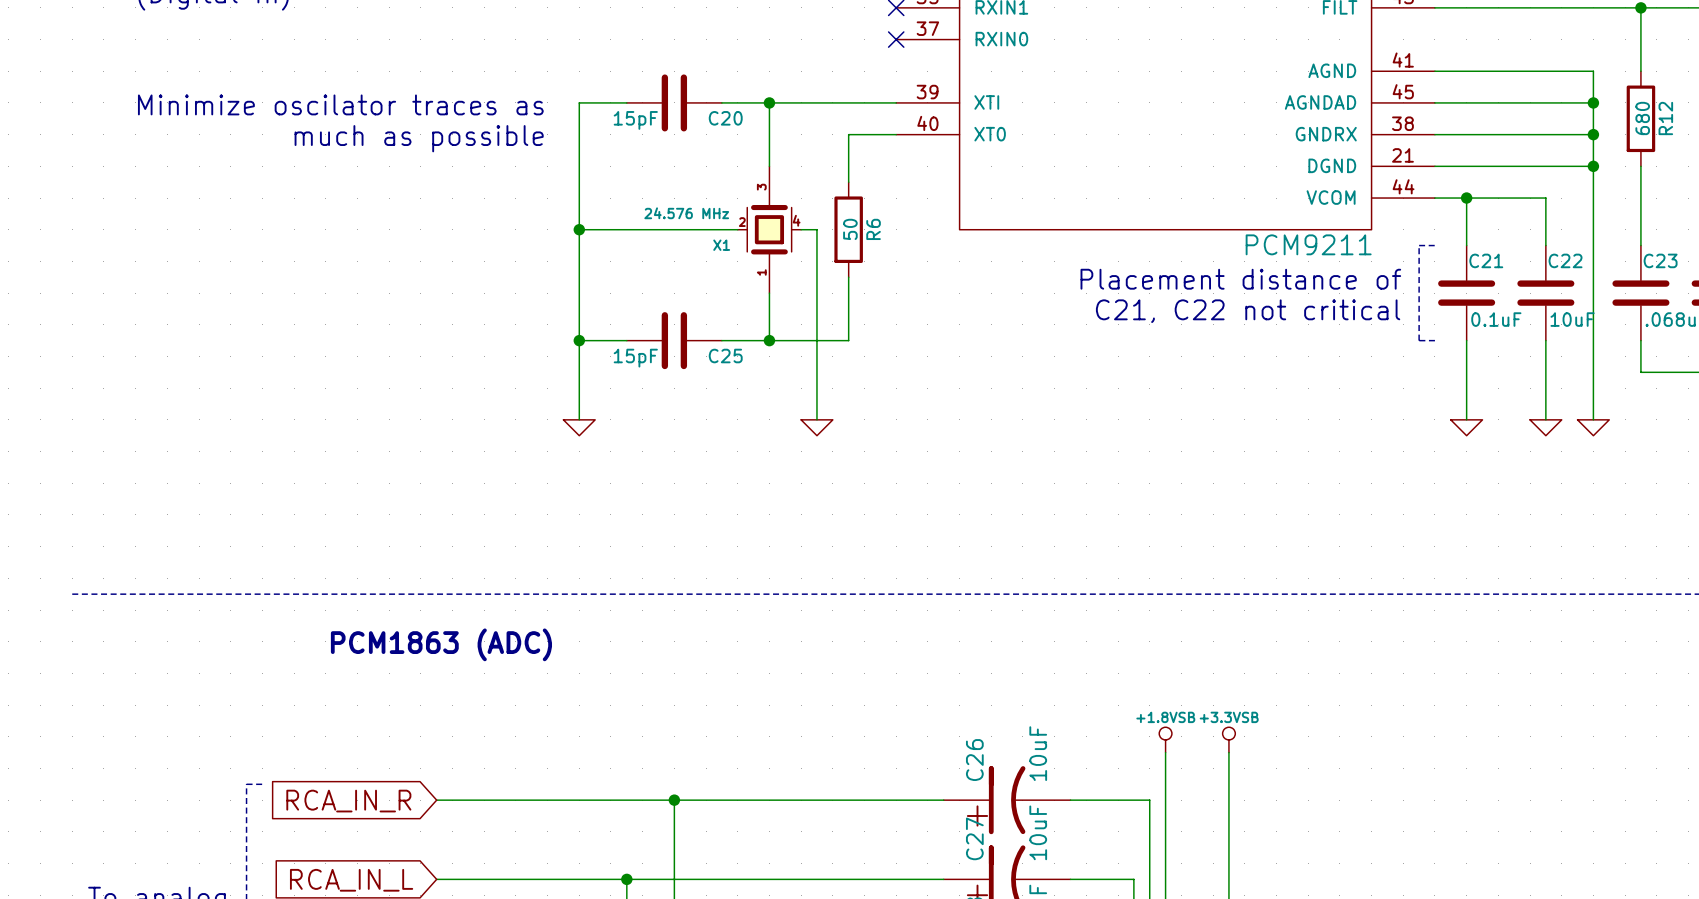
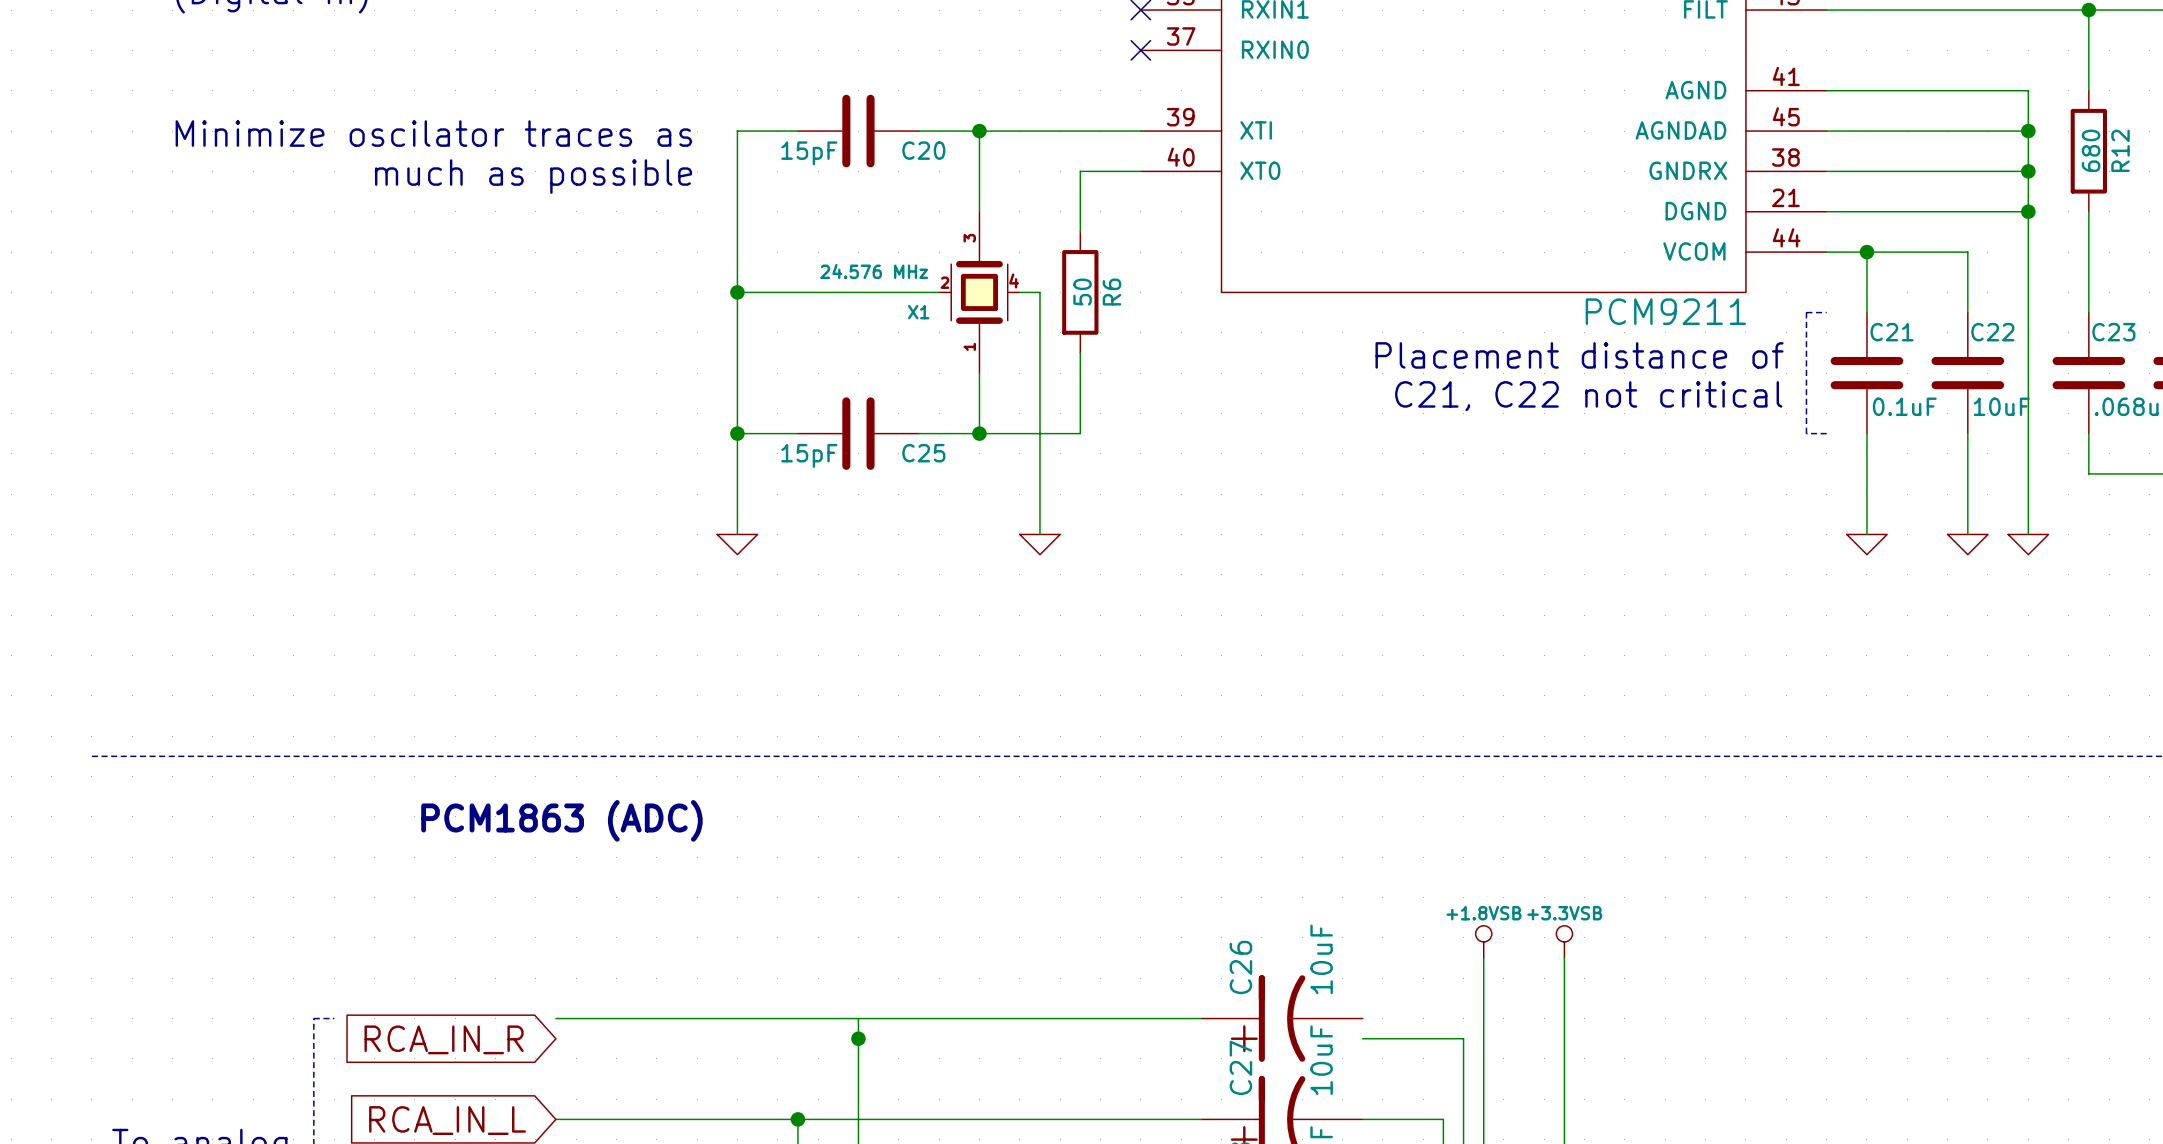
line: (262, 784) (246, 784) (246, 800) -> (334, 1018) (313, 1018)
junction position: (674, 800) -> (858, 1038)
wire: (1070, 800) (1149, 800) (1149, 815) -> (1362, 1038) (1463, 1038)
global label position: RCA_IN_R (348, 801) -> RCA_IN_R (444, 1039)

